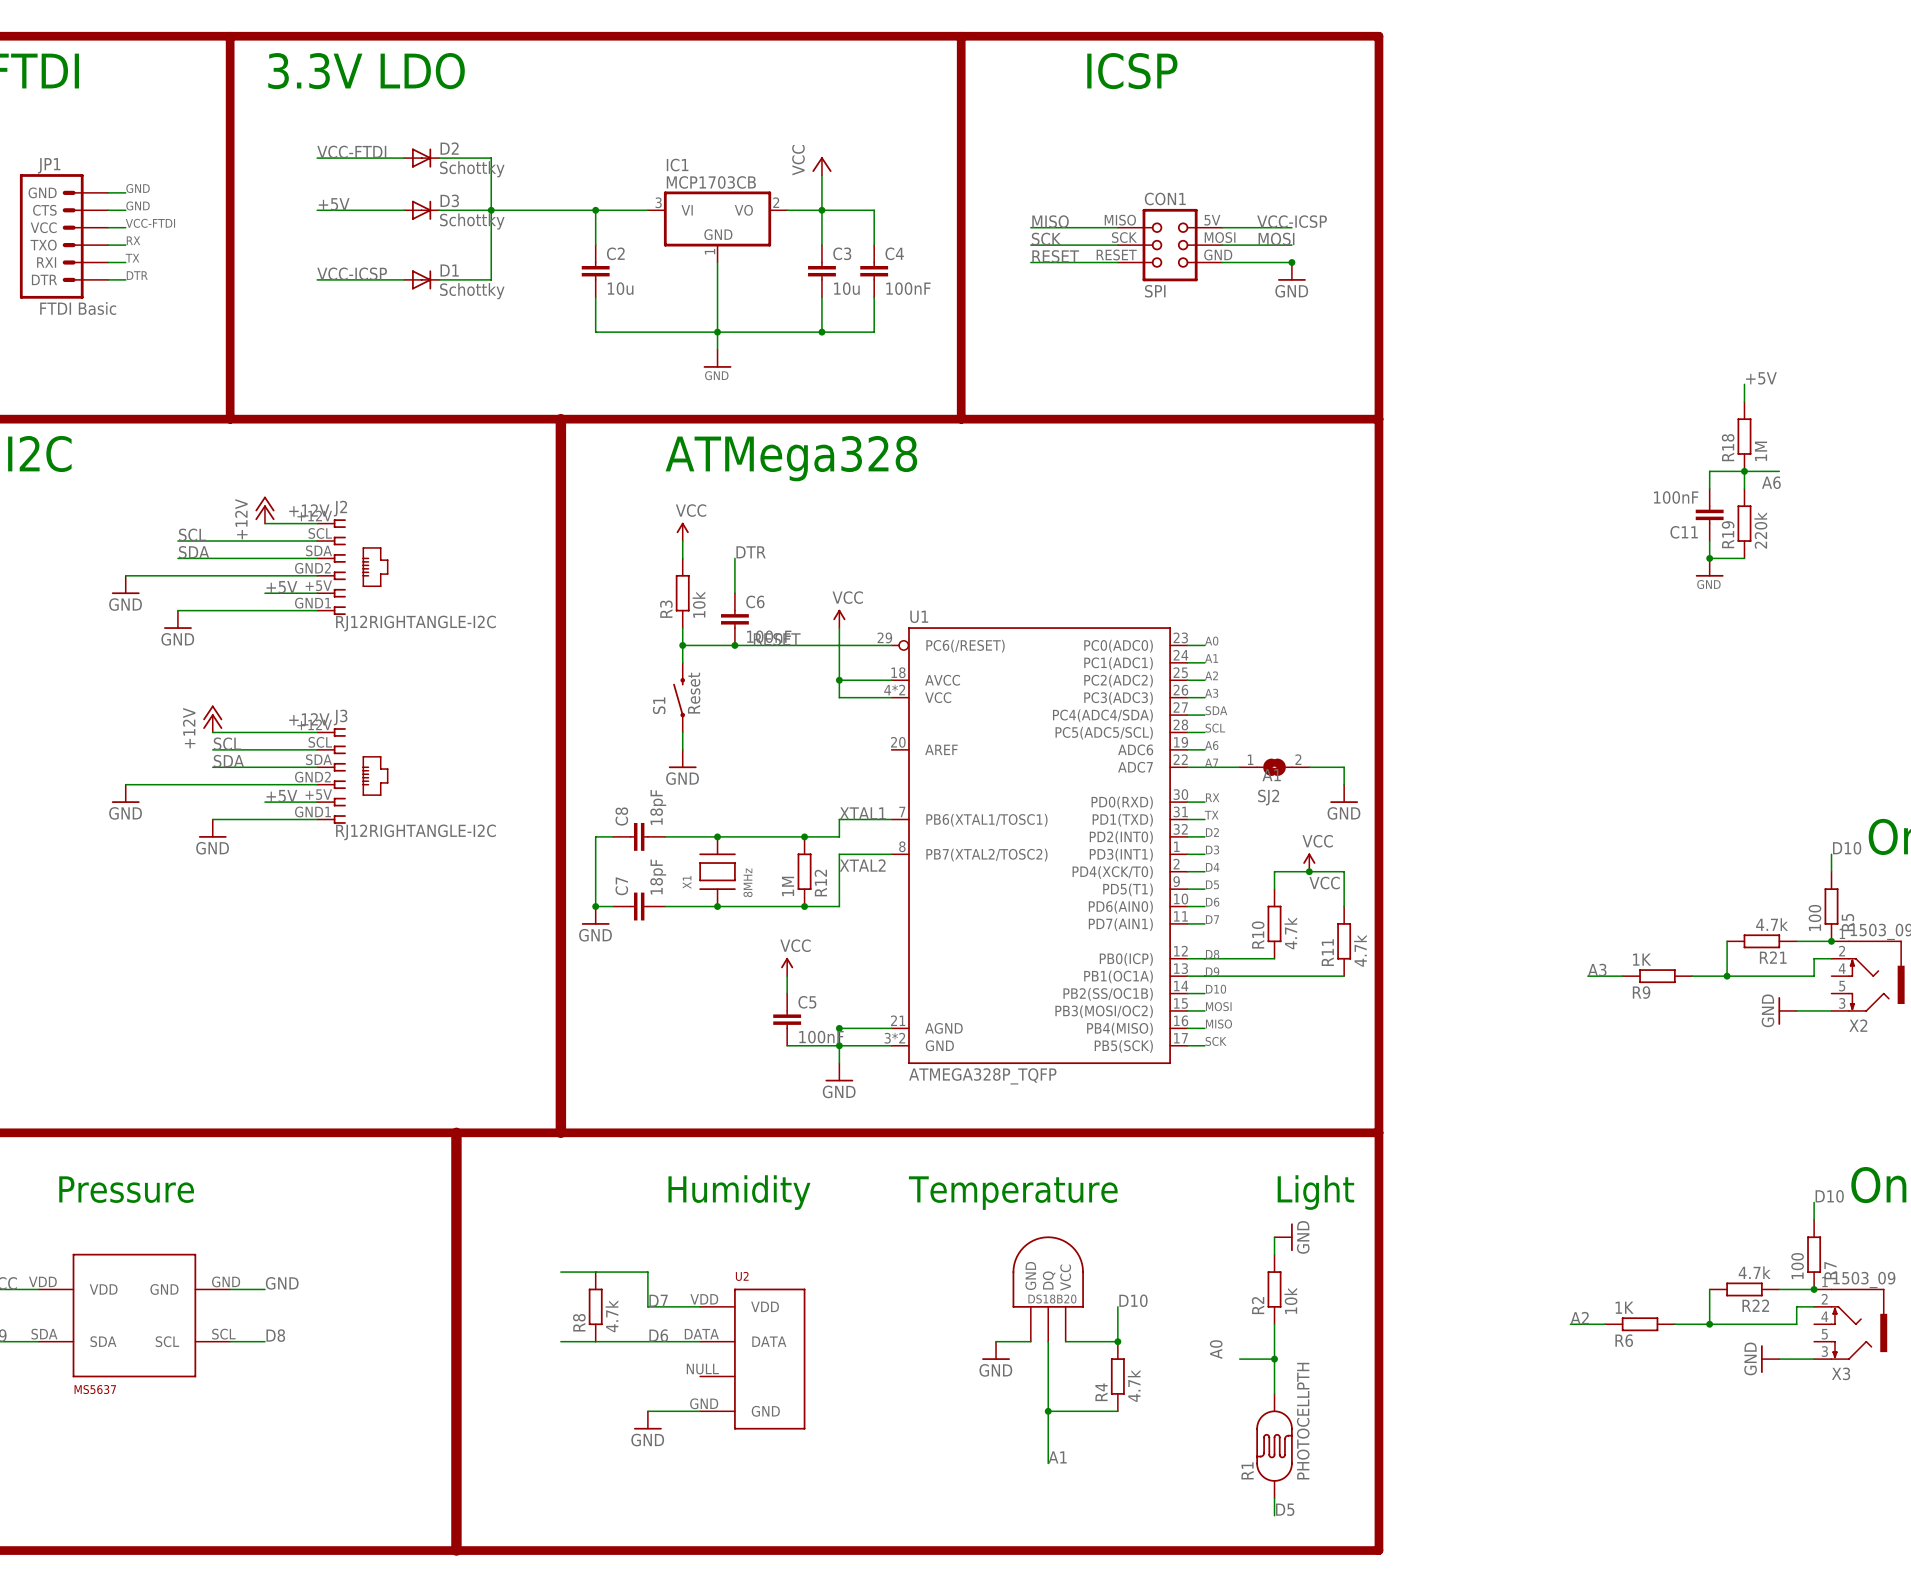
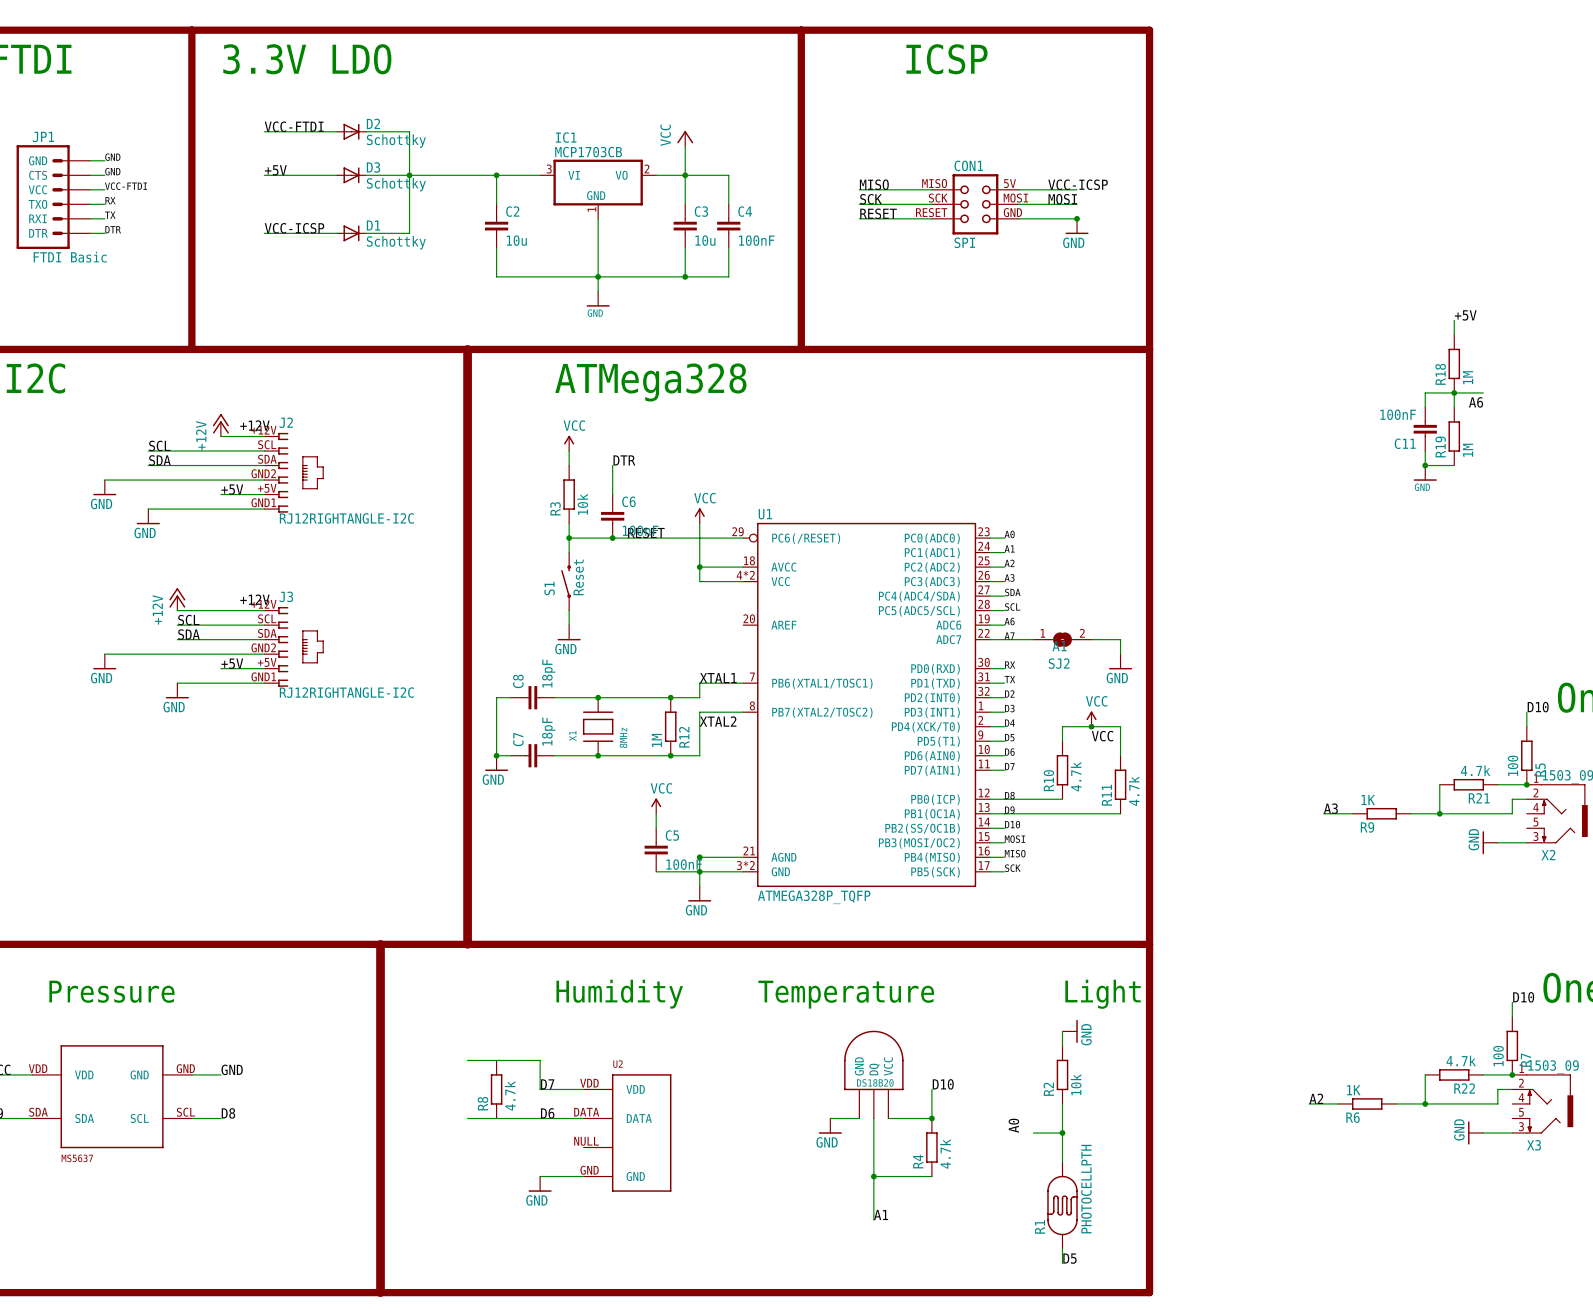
R19 value: 220k (1760, 530) -> 1M (1468, 450)

